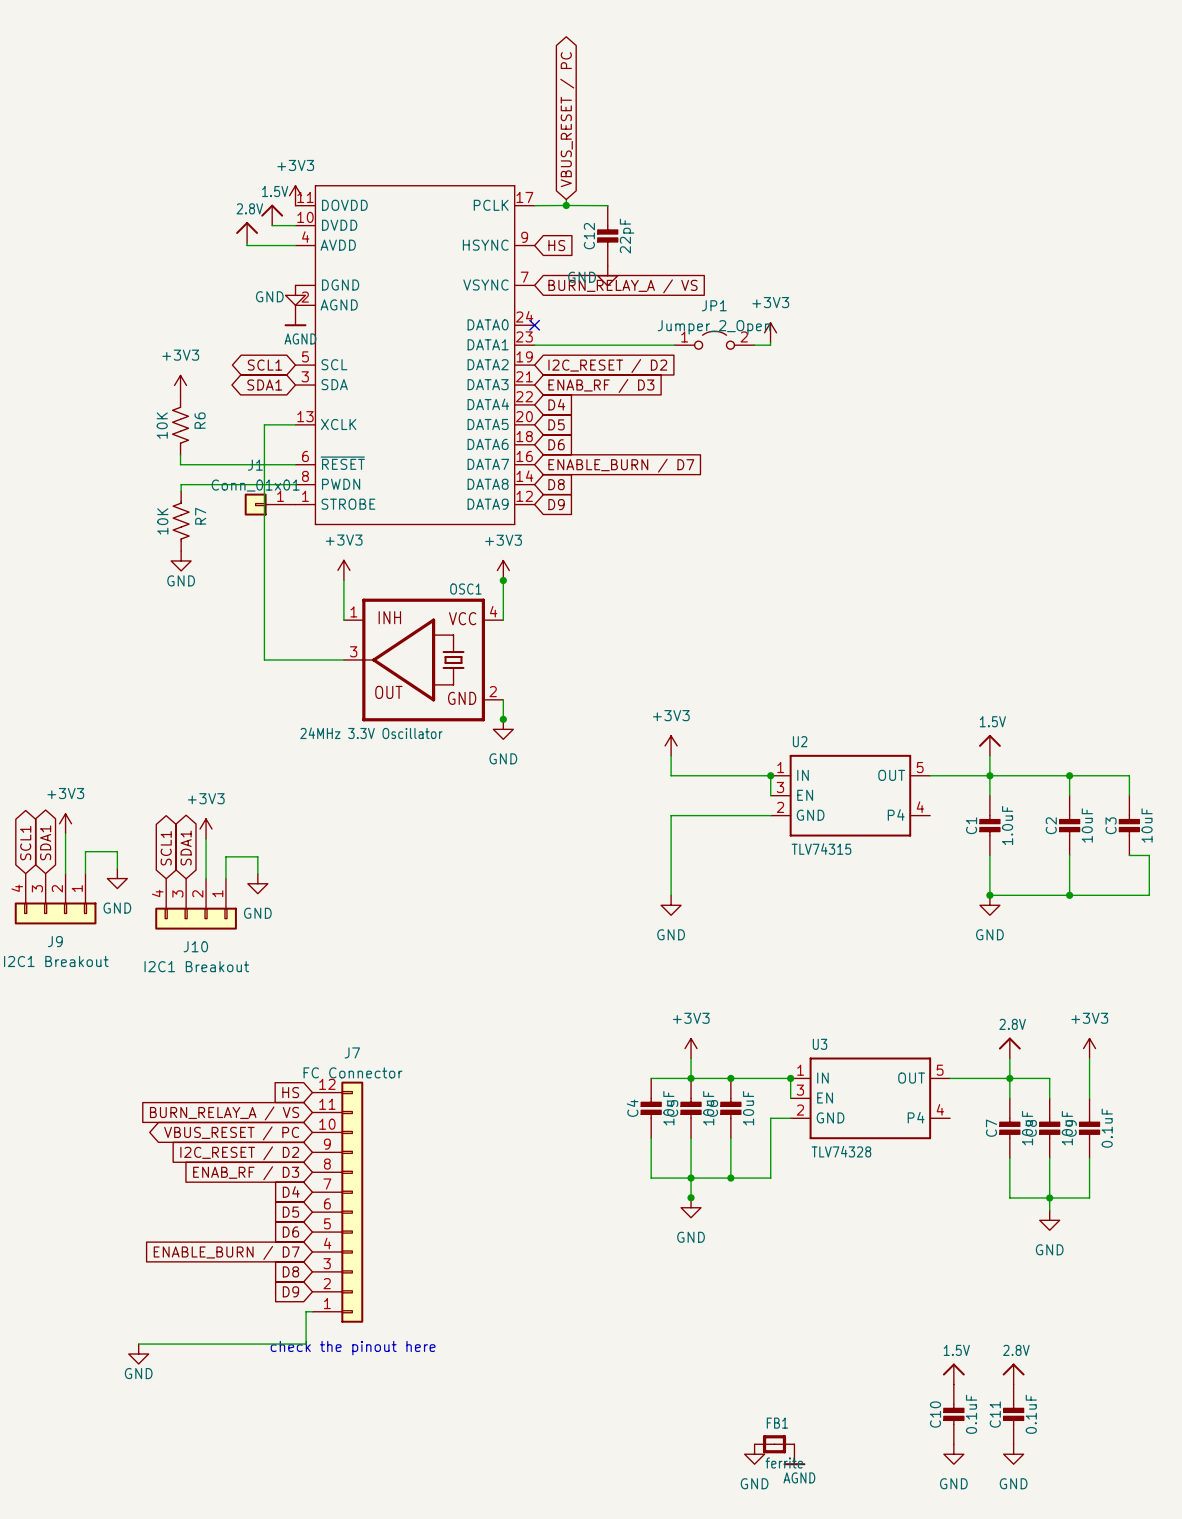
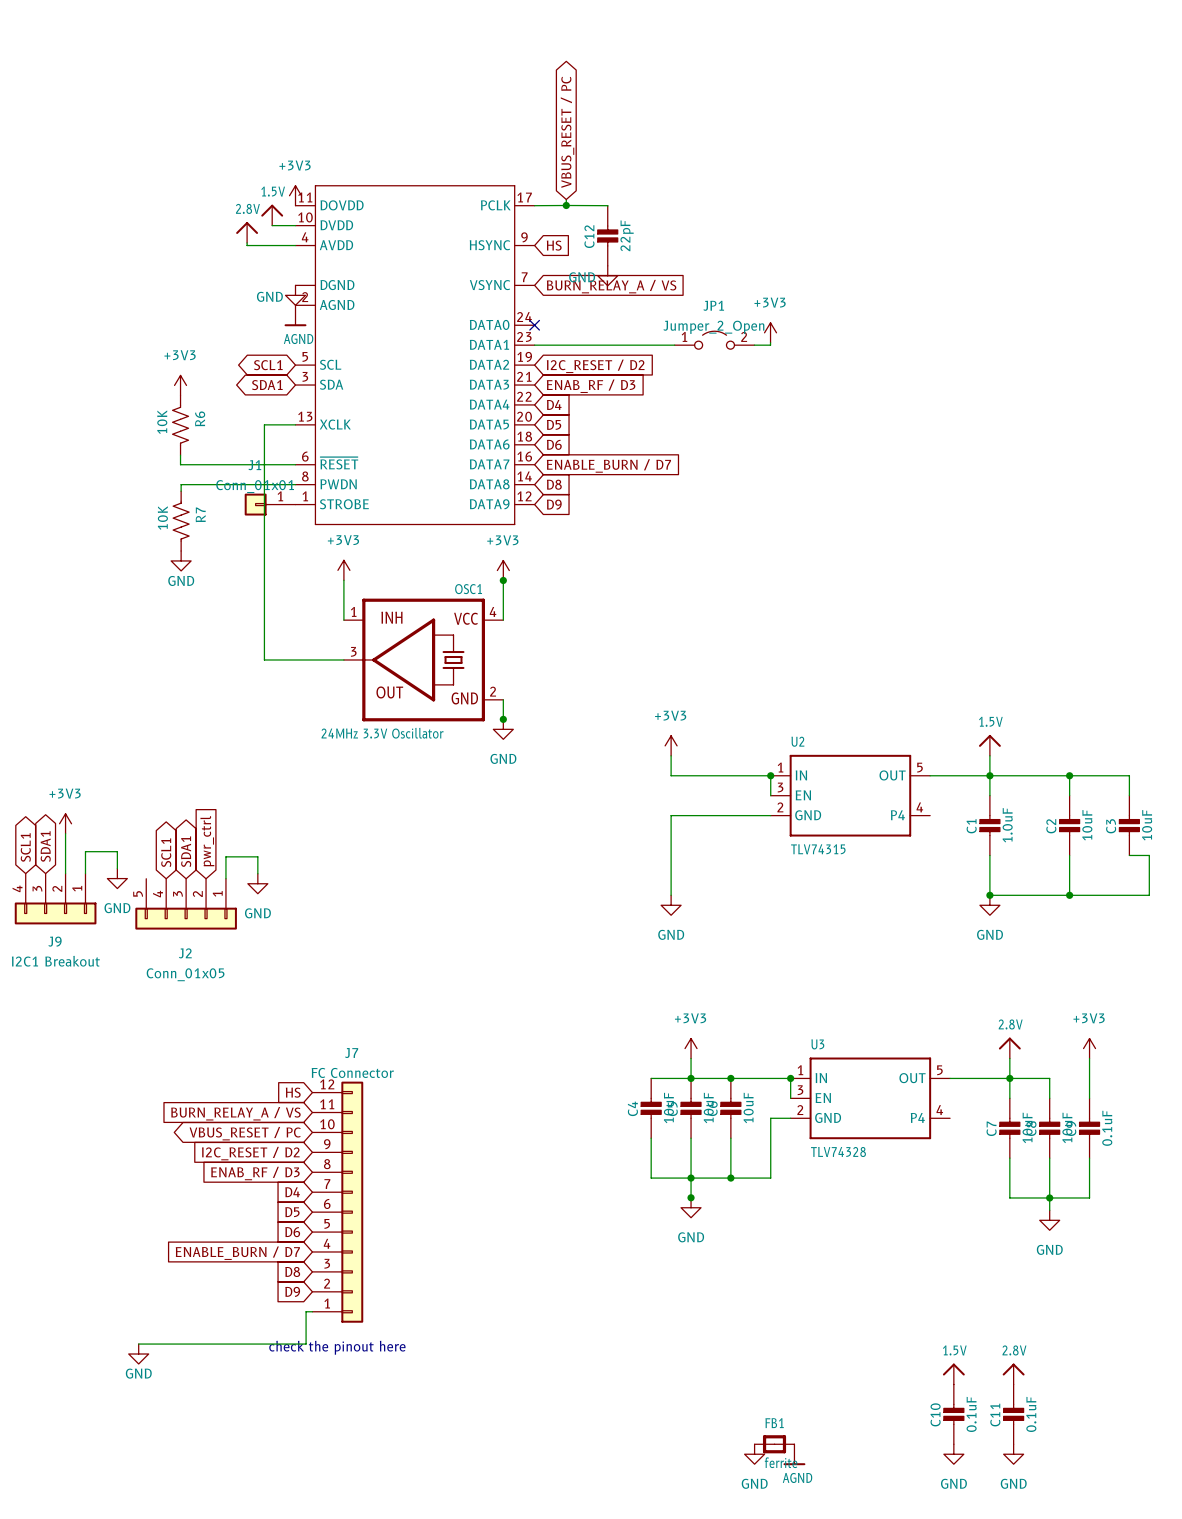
power symbol: +3V3 (206, 828) -> none
global label: none -> pwr_ctrl (207, 841)
wire: (206, 838) (206, 878) -> none
J2: none -> Conn_01x05 (186, 904)
J10: I2C1 Breakout (196, 904) -> none

